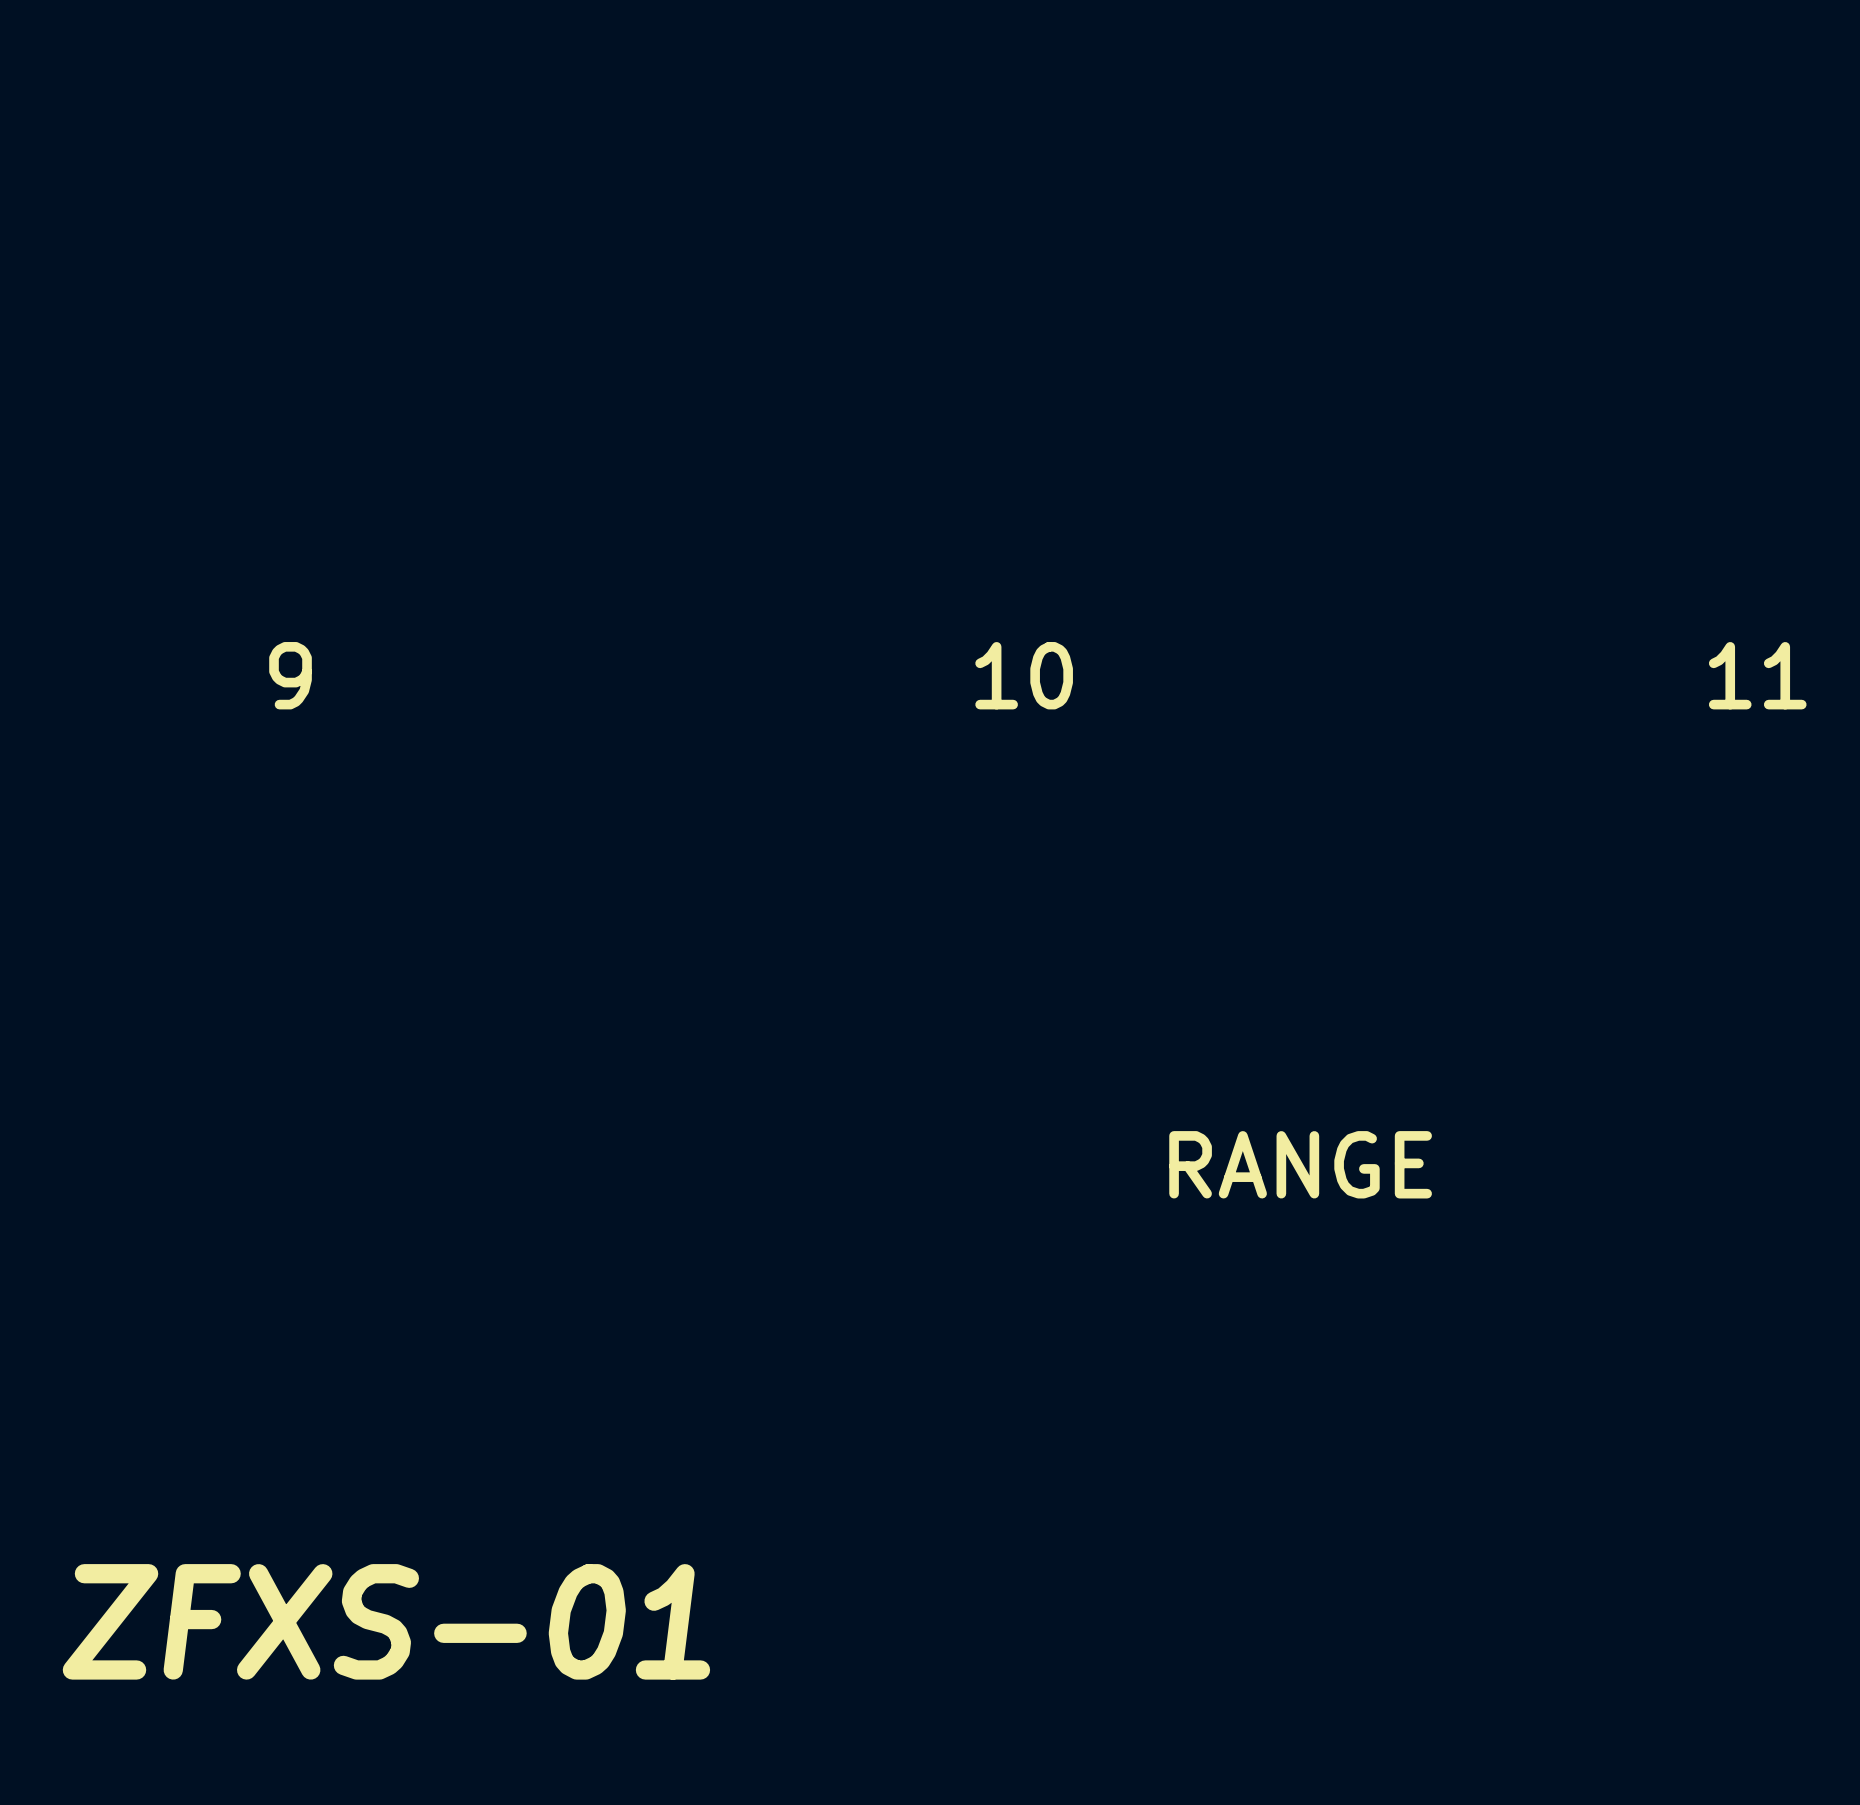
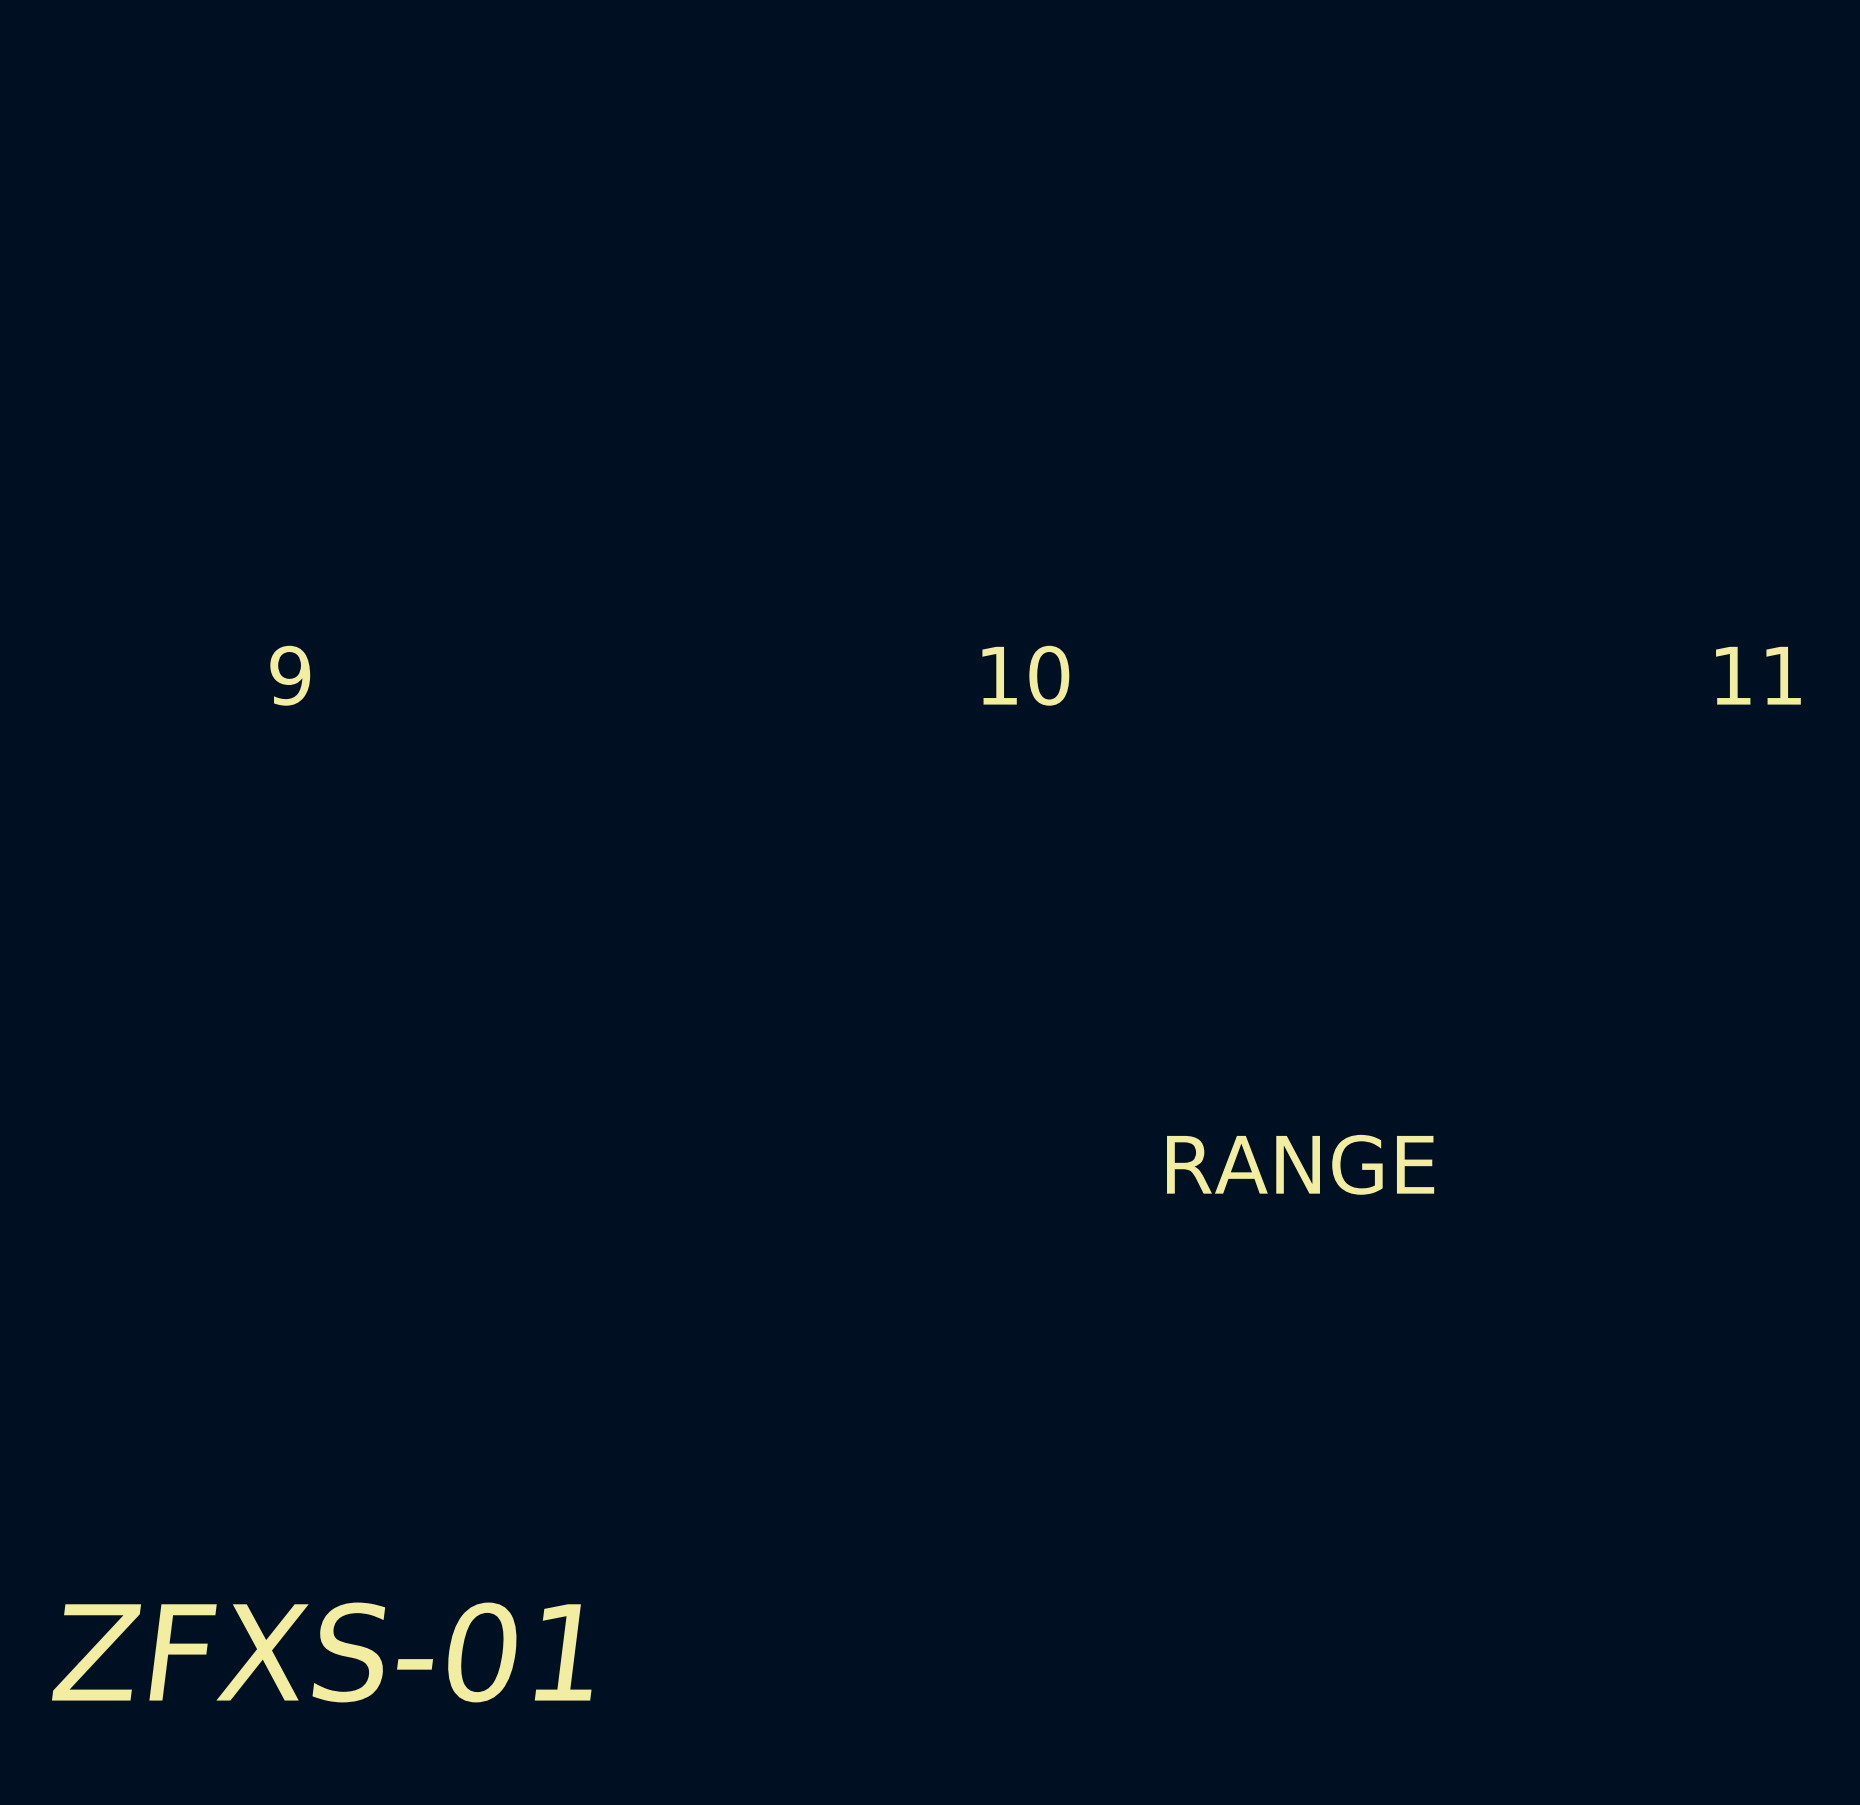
text position: ZFXS-01 (386, 1621) -> ZFXS-01 (321, 1652)

